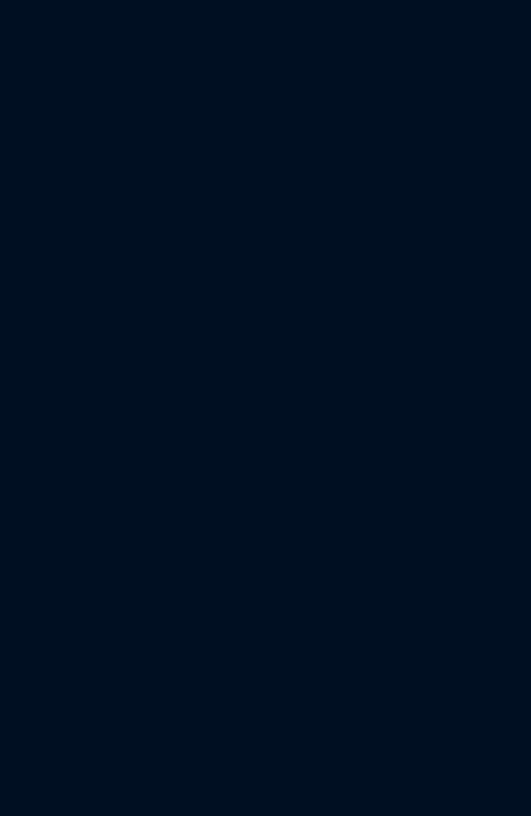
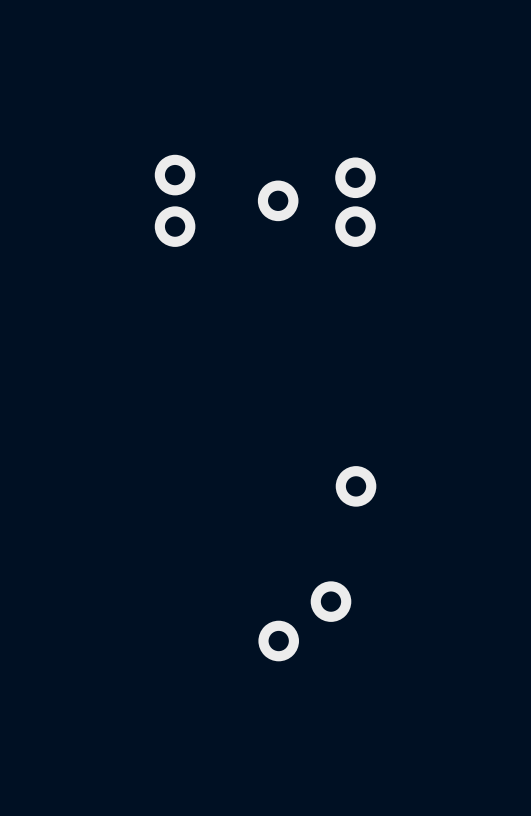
via: none -> (175, 175)
via: none -> (355, 177)
via: none -> (278, 200)
via: none -> (175, 226)
via: none -> (355, 226)
via: none -> (356, 486)
via: none -> (331, 601)
via: none -> (278, 641)

